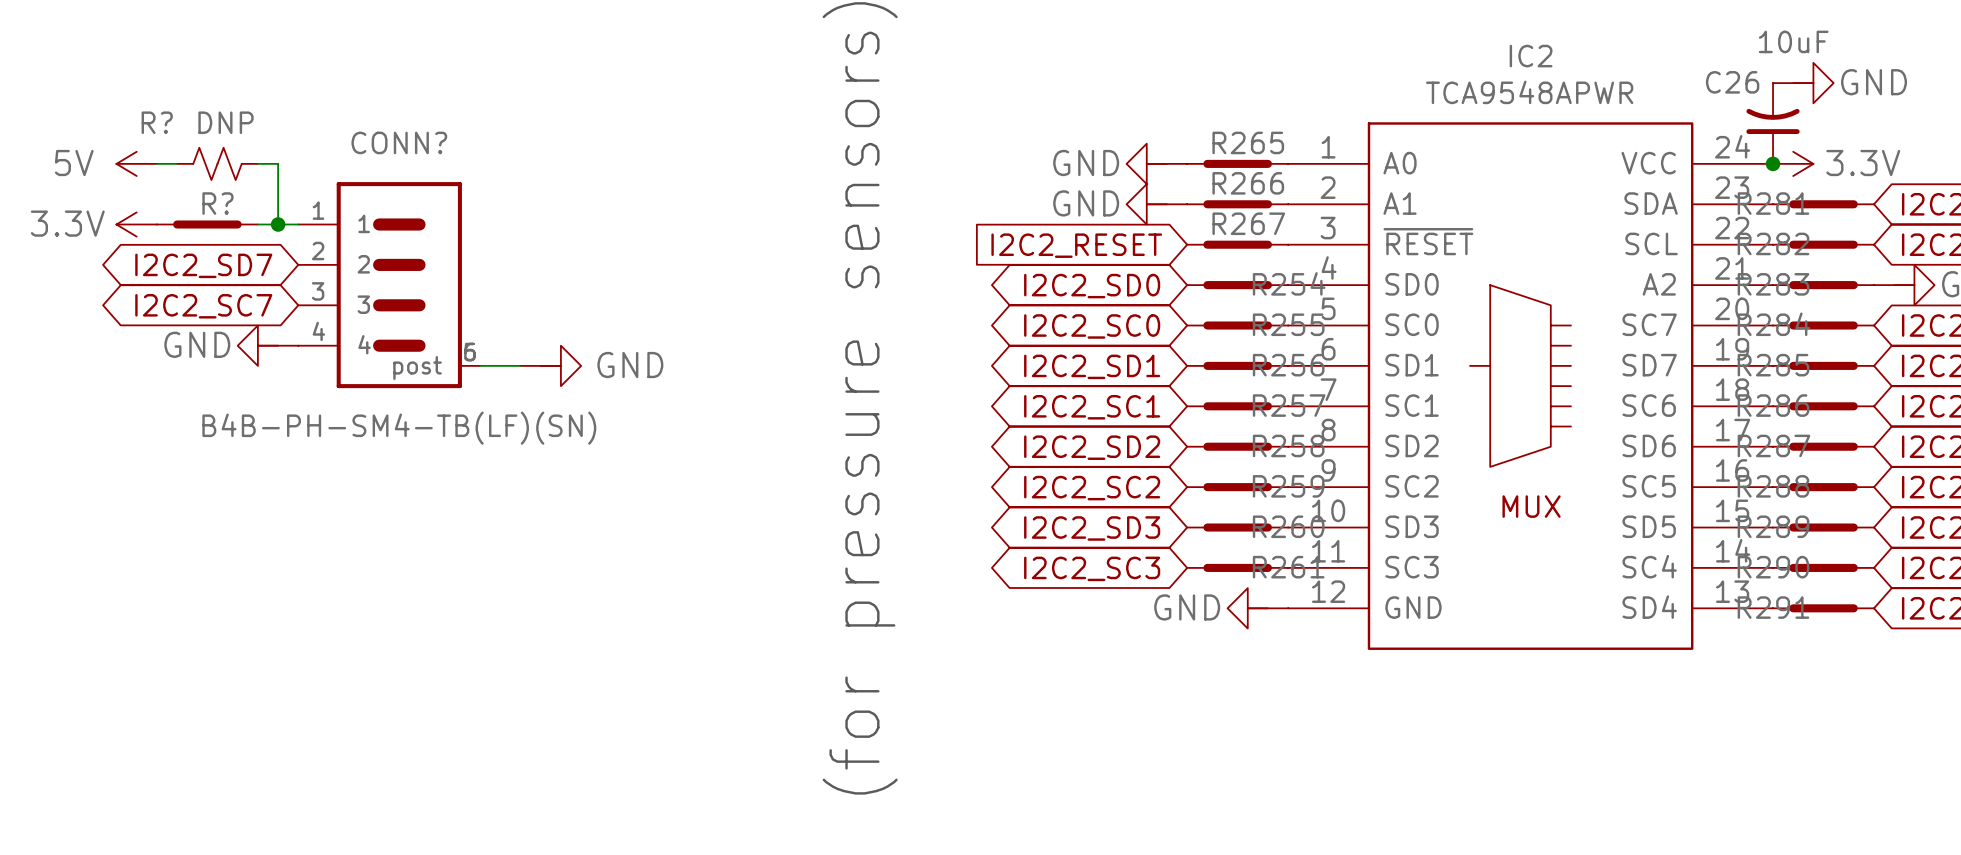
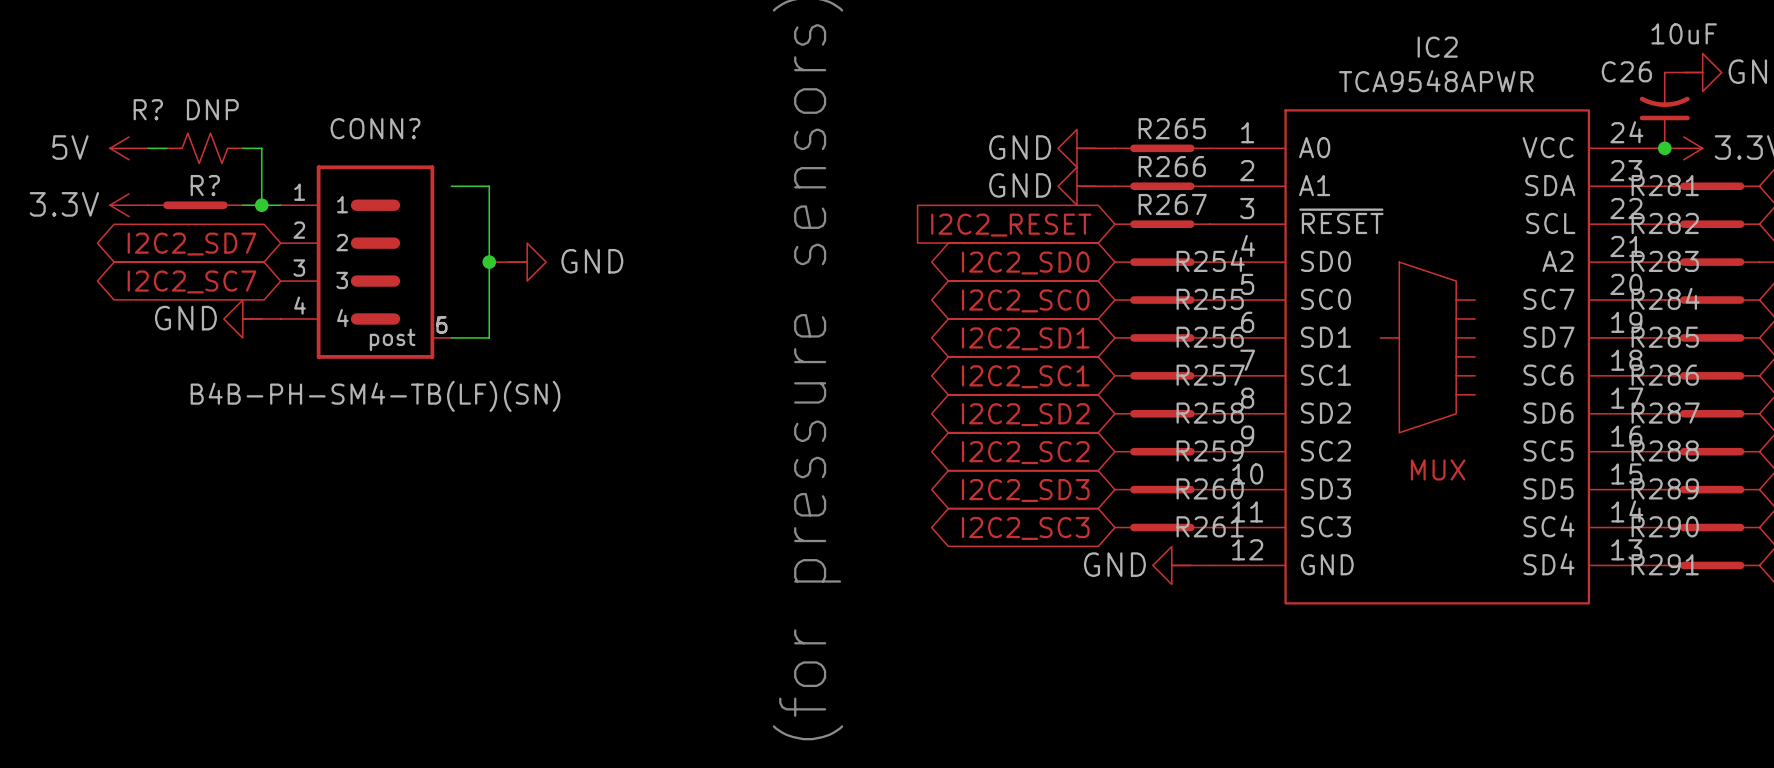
wire: none -> (451, 186) (489, 186) (489, 337)
junction: none -> (489, 262)
power symbol position: GND (550, 365) -> GND (517, 262)

